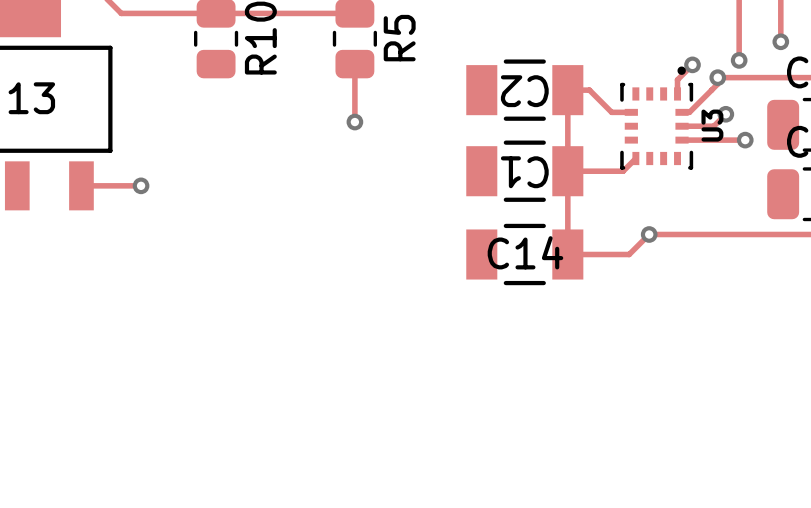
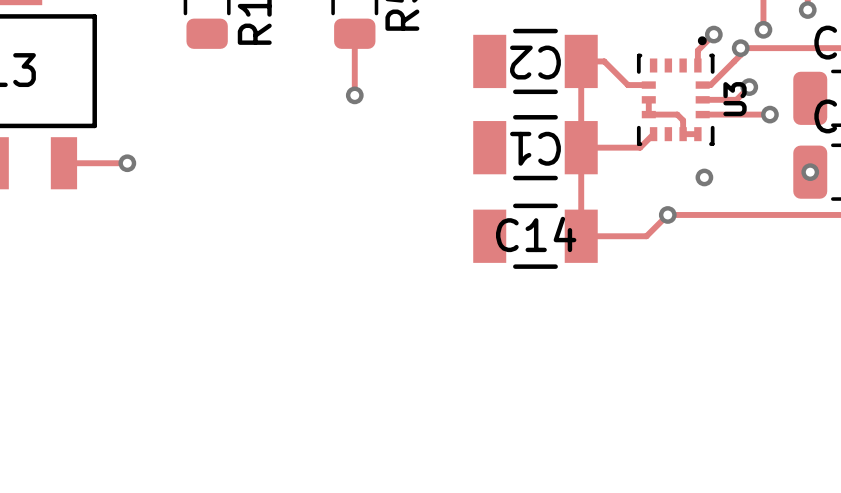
track: none -> (648, 99) (648, 114) (677, 114) (683, 120) (683, 134) (697, 134)
via: none -> (810, 172)
via: none -> (704, 177)

